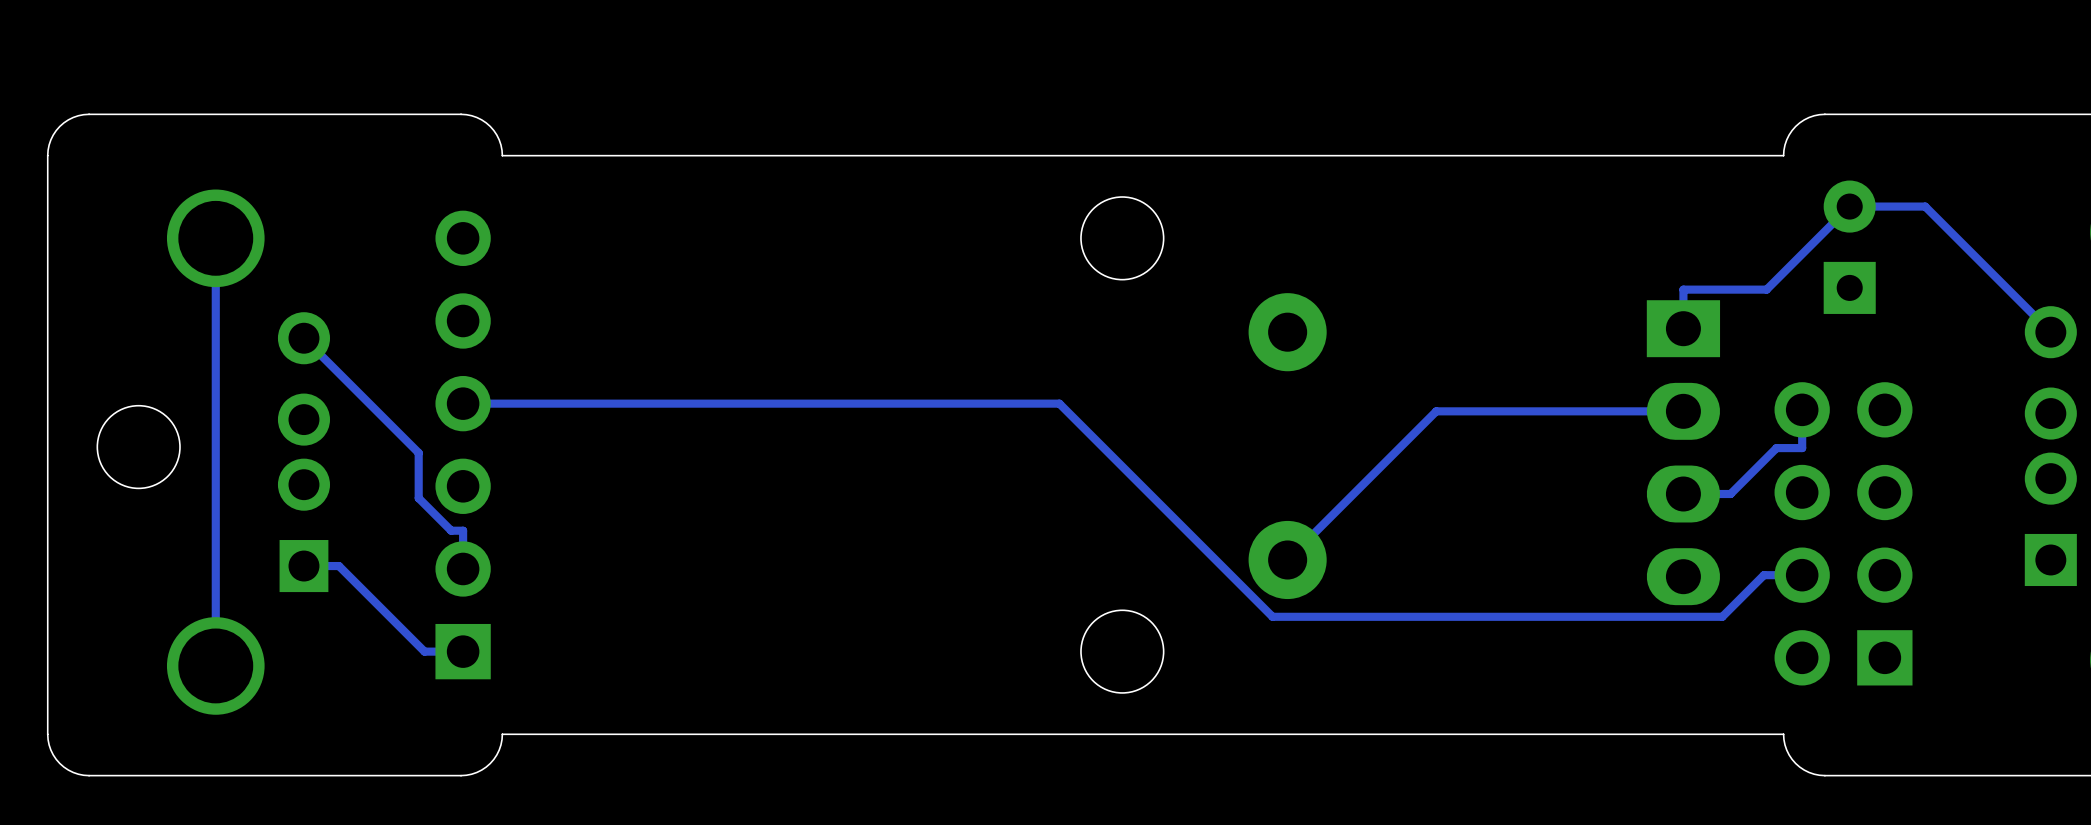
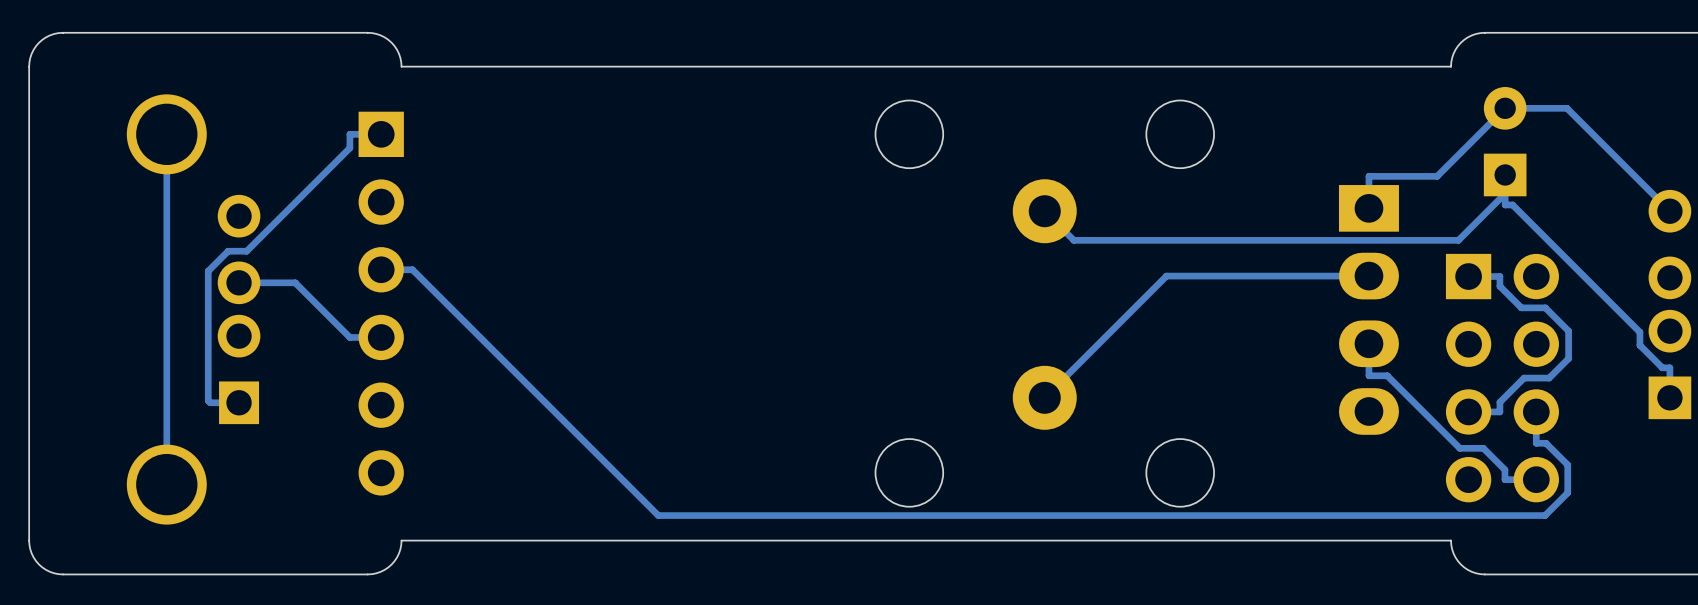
round board edge: none -> [1145, 99, 1215, 169]
track: none -> (1505, 174) (1505, 204) (1512, 204) (1639, 332) (1639, 345) (1662, 367) (1669, 367) (1669, 397)
track: none -> (1505, 193) (1458, 240) (1073, 240) (1044, 211)
track: (303, 338) (418, 452) (418, 498) (451, 530) (463, 530) (463, 568) -> none
track: (515, 403) (1059, 403) (1272, 616) (1722, 616) (1763, 575) (1802, 575) -> (412, 269) (658, 515) (1545, 515) (1567, 492) (1567, 464) (1546, 443) (1536, 443) (1536, 411)
round board edge: [96, 404, 181, 490] -> none
track: (1802, 409) (1802, 448) (1776, 448) (1730, 494) (1683, 494) -> (1536, 479) (1504, 479) (1504, 469) (1483, 448) (1459, 448) (1387, 375) (1368, 375) (1368, 343)
track: none -> (1468, 276) (1499, 276) (1499, 286) (1521, 307) (1545, 307) (1568, 331) (1568, 358) (1549, 378) (1524, 378) (1499, 402) (1499, 411) (1468, 411)
track: none -> (239, 282) (295, 282) (349, 337) (381, 337)
part rotation: 0° (463, 444) -> 180° (381, 303)
part rotation: 0° (1843, 533) -> 180° (1502, 378)
track: (303, 566) (338, 566) (424, 651) (463, 651) -> (239, 402) (210, 402) (208, 400) (208, 271) (228, 251) (246, 251) (349, 148) (349, 134) (381, 134)
round board edge: none -> [1145, 438, 1215, 508]

